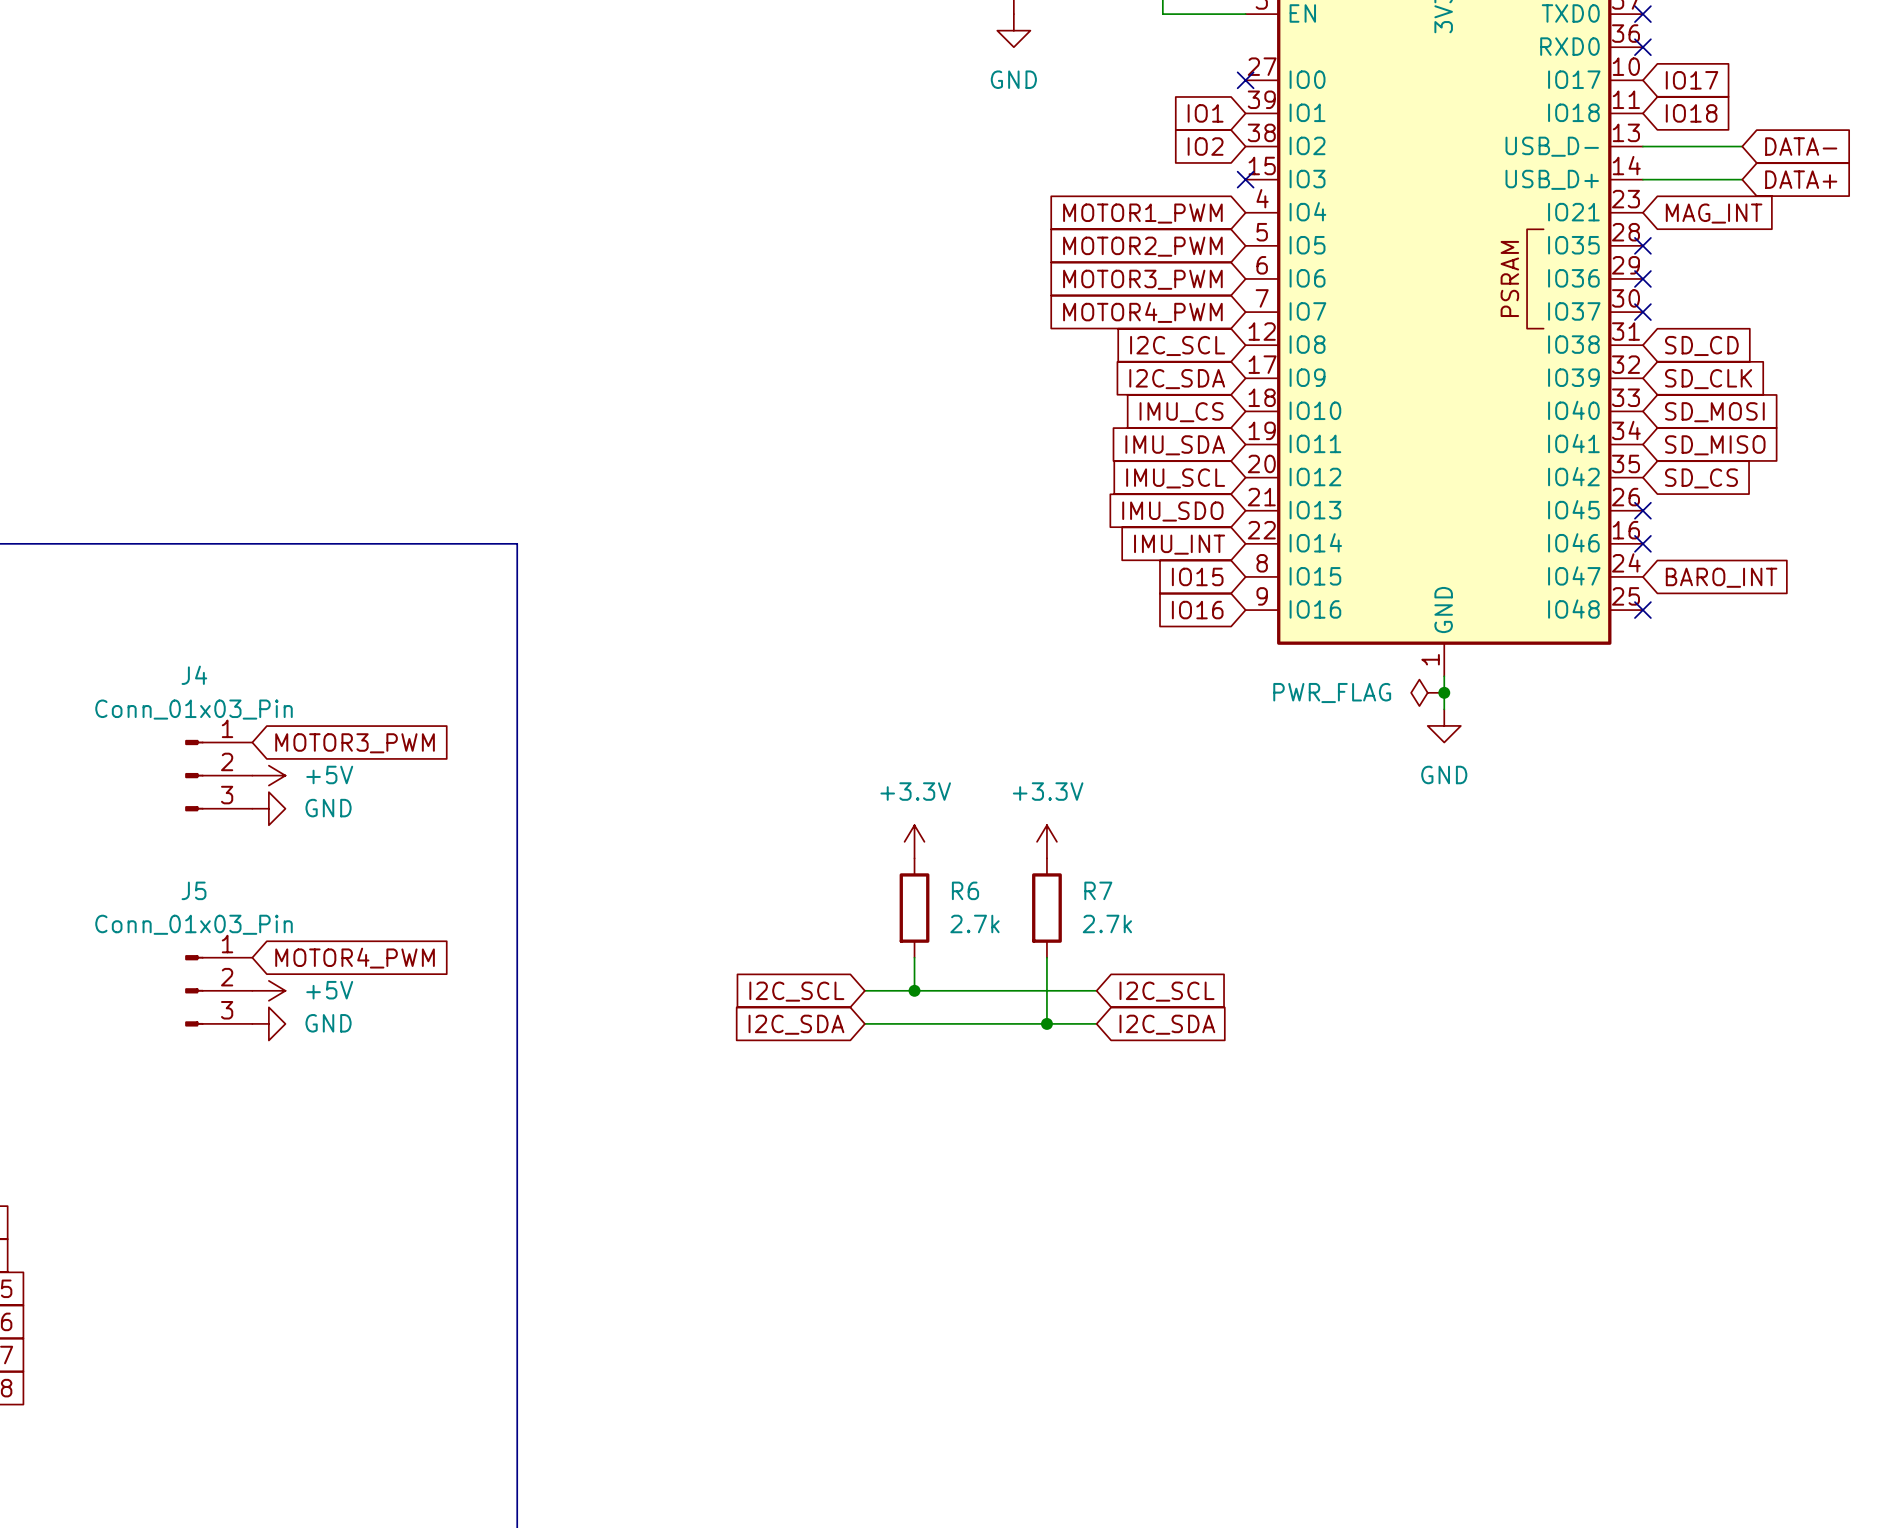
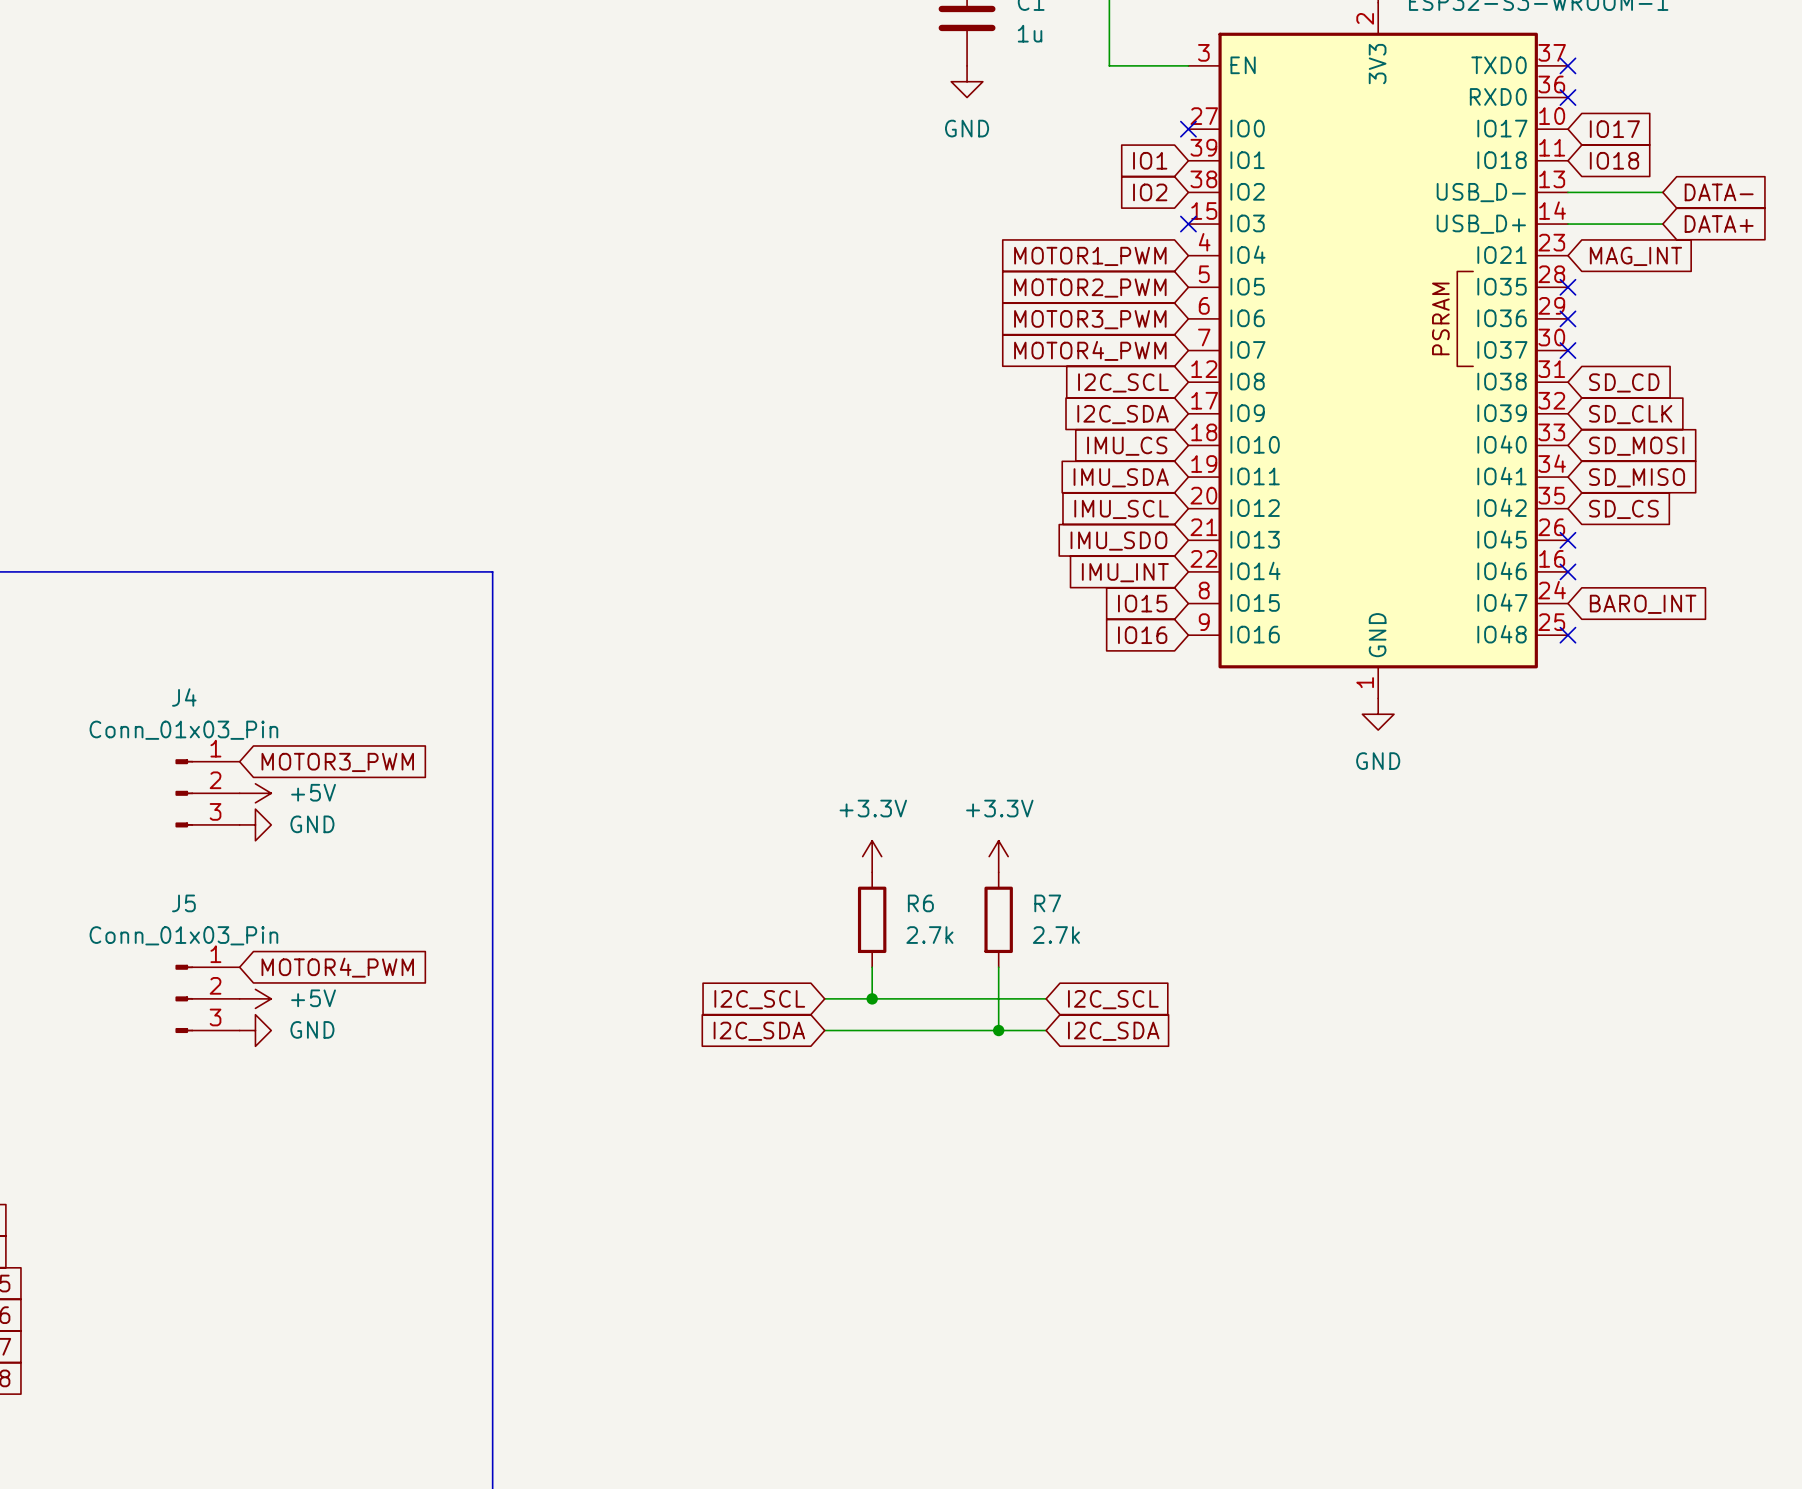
power symbol: PWR_FLAG (1427, 692) -> none
junction: (1444, 692) -> none
power symbol position: GND (1444, 725) -> GND (1378, 714)

